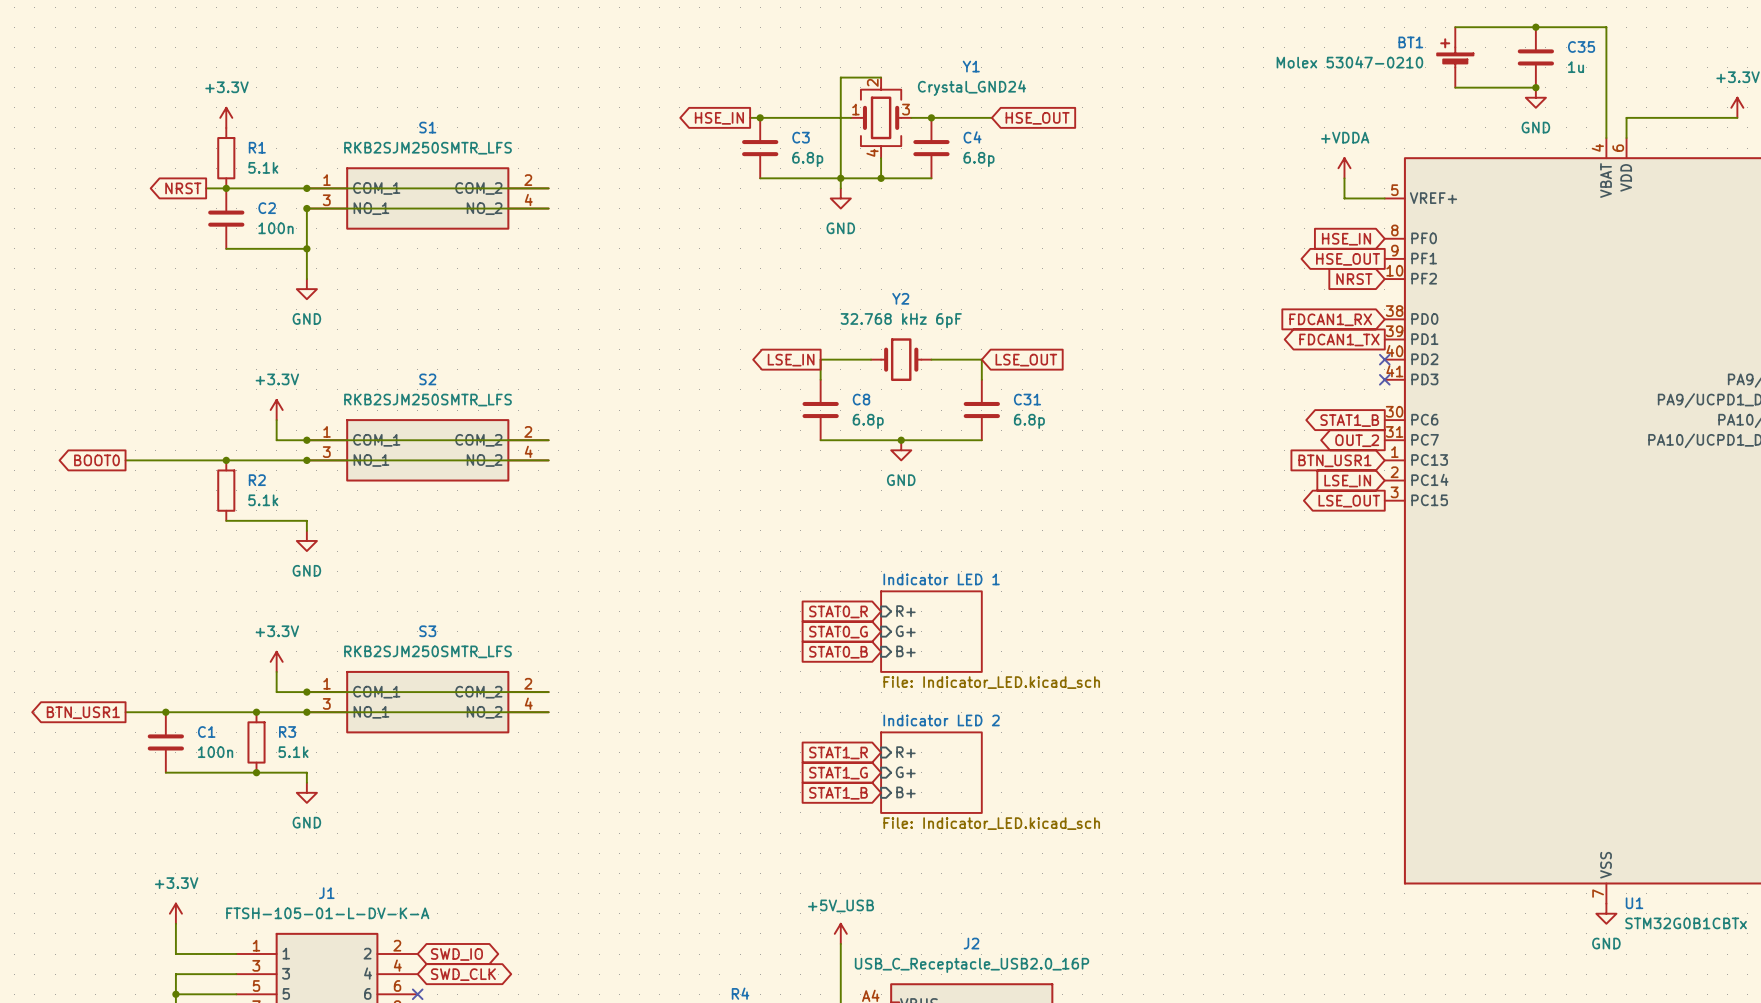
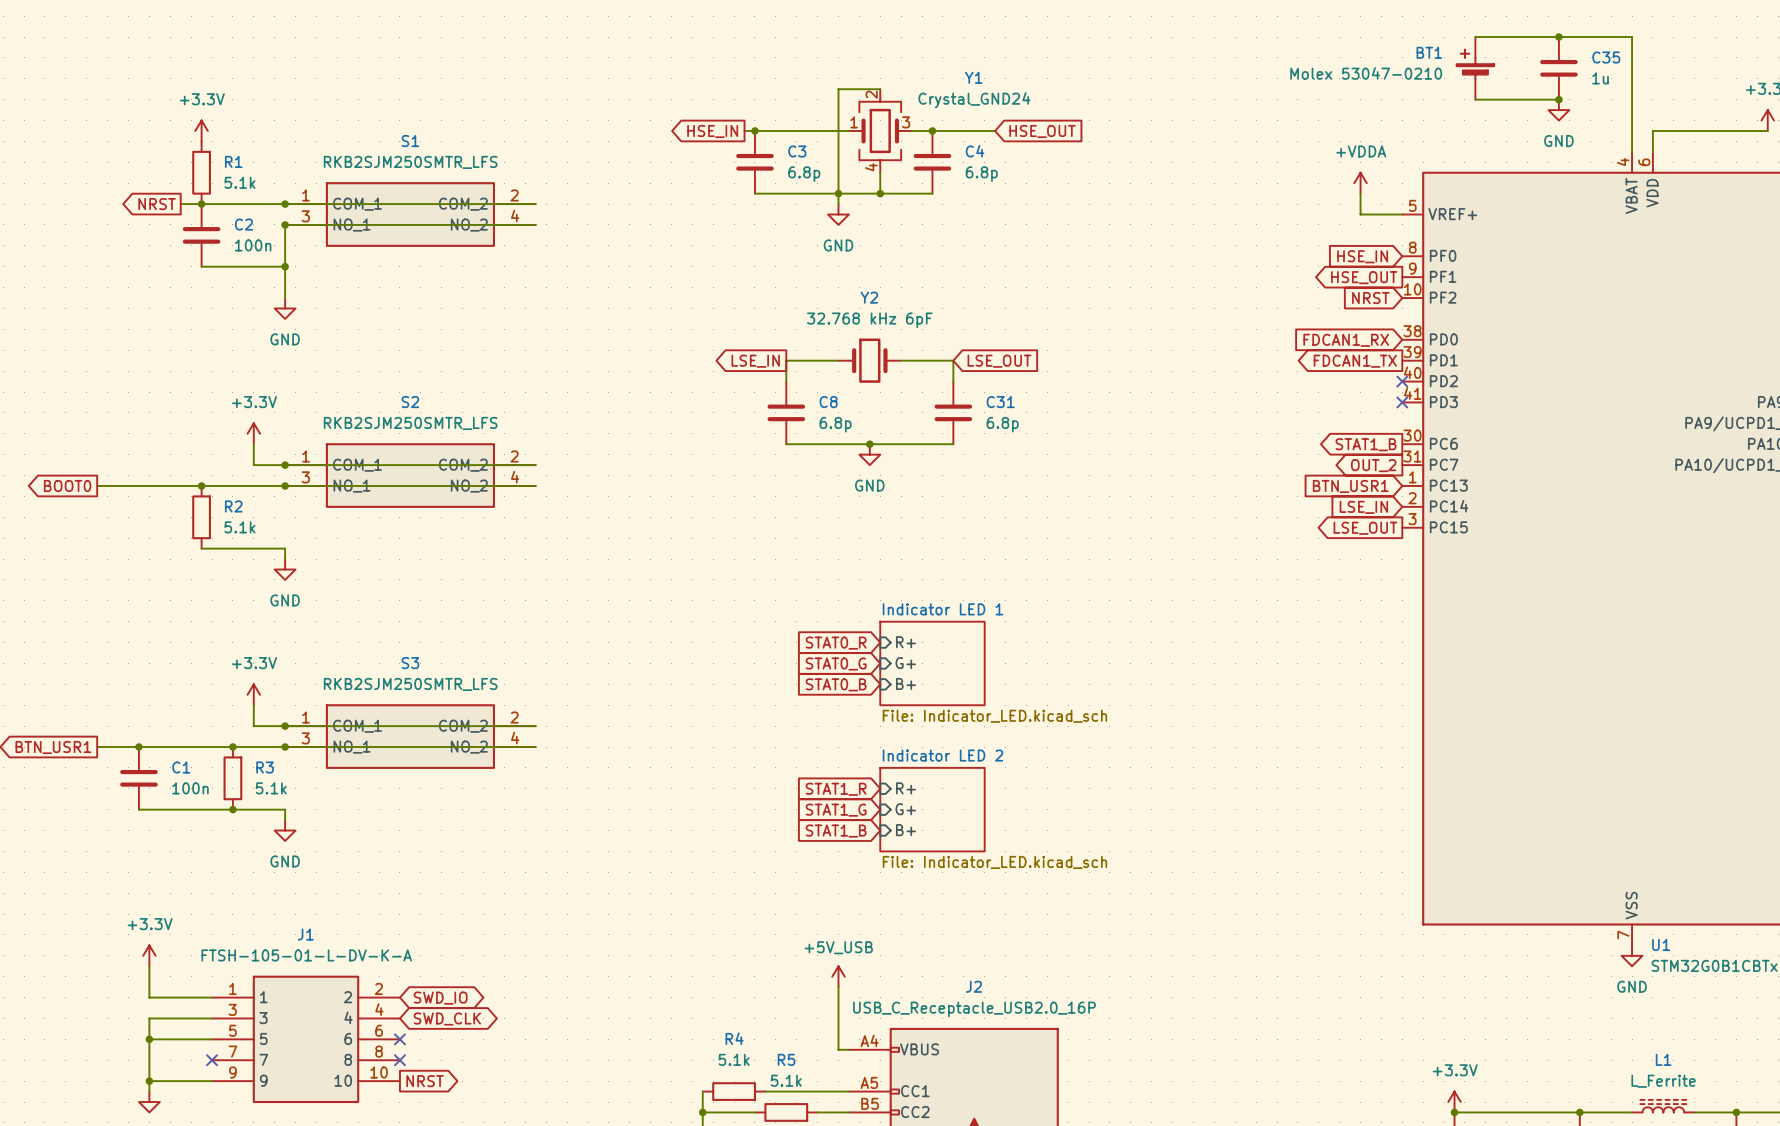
wire: (871, 359) (820, 359) (820, 379) -> (838, 360) (786, 360) (786, 381)
Y2 position: (901, 359) -> (869, 360)
wire: (931, 359) (981, 359) (981, 379) -> (901, 360) (953, 360) (953, 381)
global label position: LSE_IN (791, 360) -> LSE_IN (755, 361)
global label position: LSE_OUT (1026, 360) -> LSE_OUT (999, 361)
C8 position: (820, 410) -> (786, 412)
C31 position: (981, 410) -> (953, 412)
wire: (820, 440) (981, 440) -> (786, 444) (953, 444)
junction position: (901, 440) -> (869, 444)
power symbol position: GND (901, 450) -> GND (869, 454)

